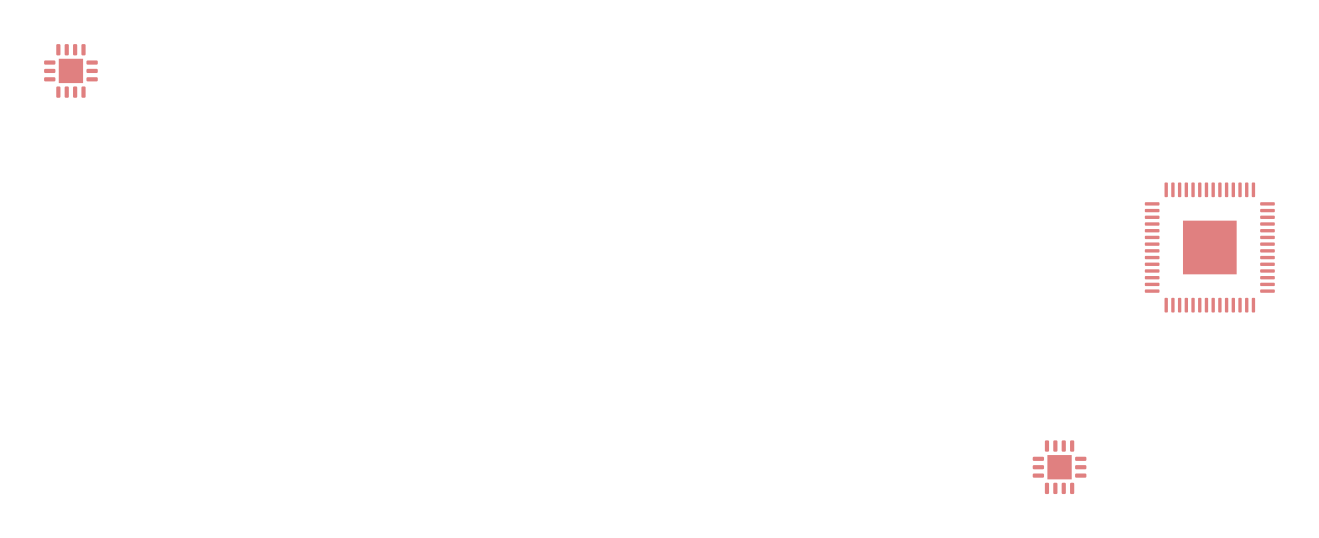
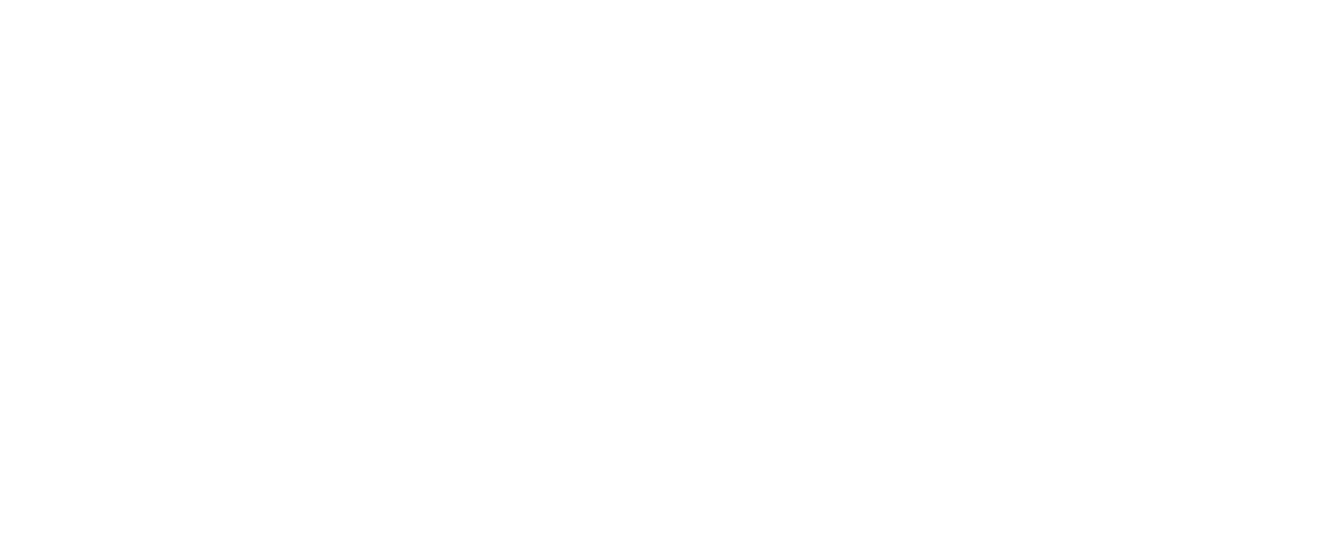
part: (70, 70) -> none
part: (1209, 247) -> none
part: (1059, 467) -> none

